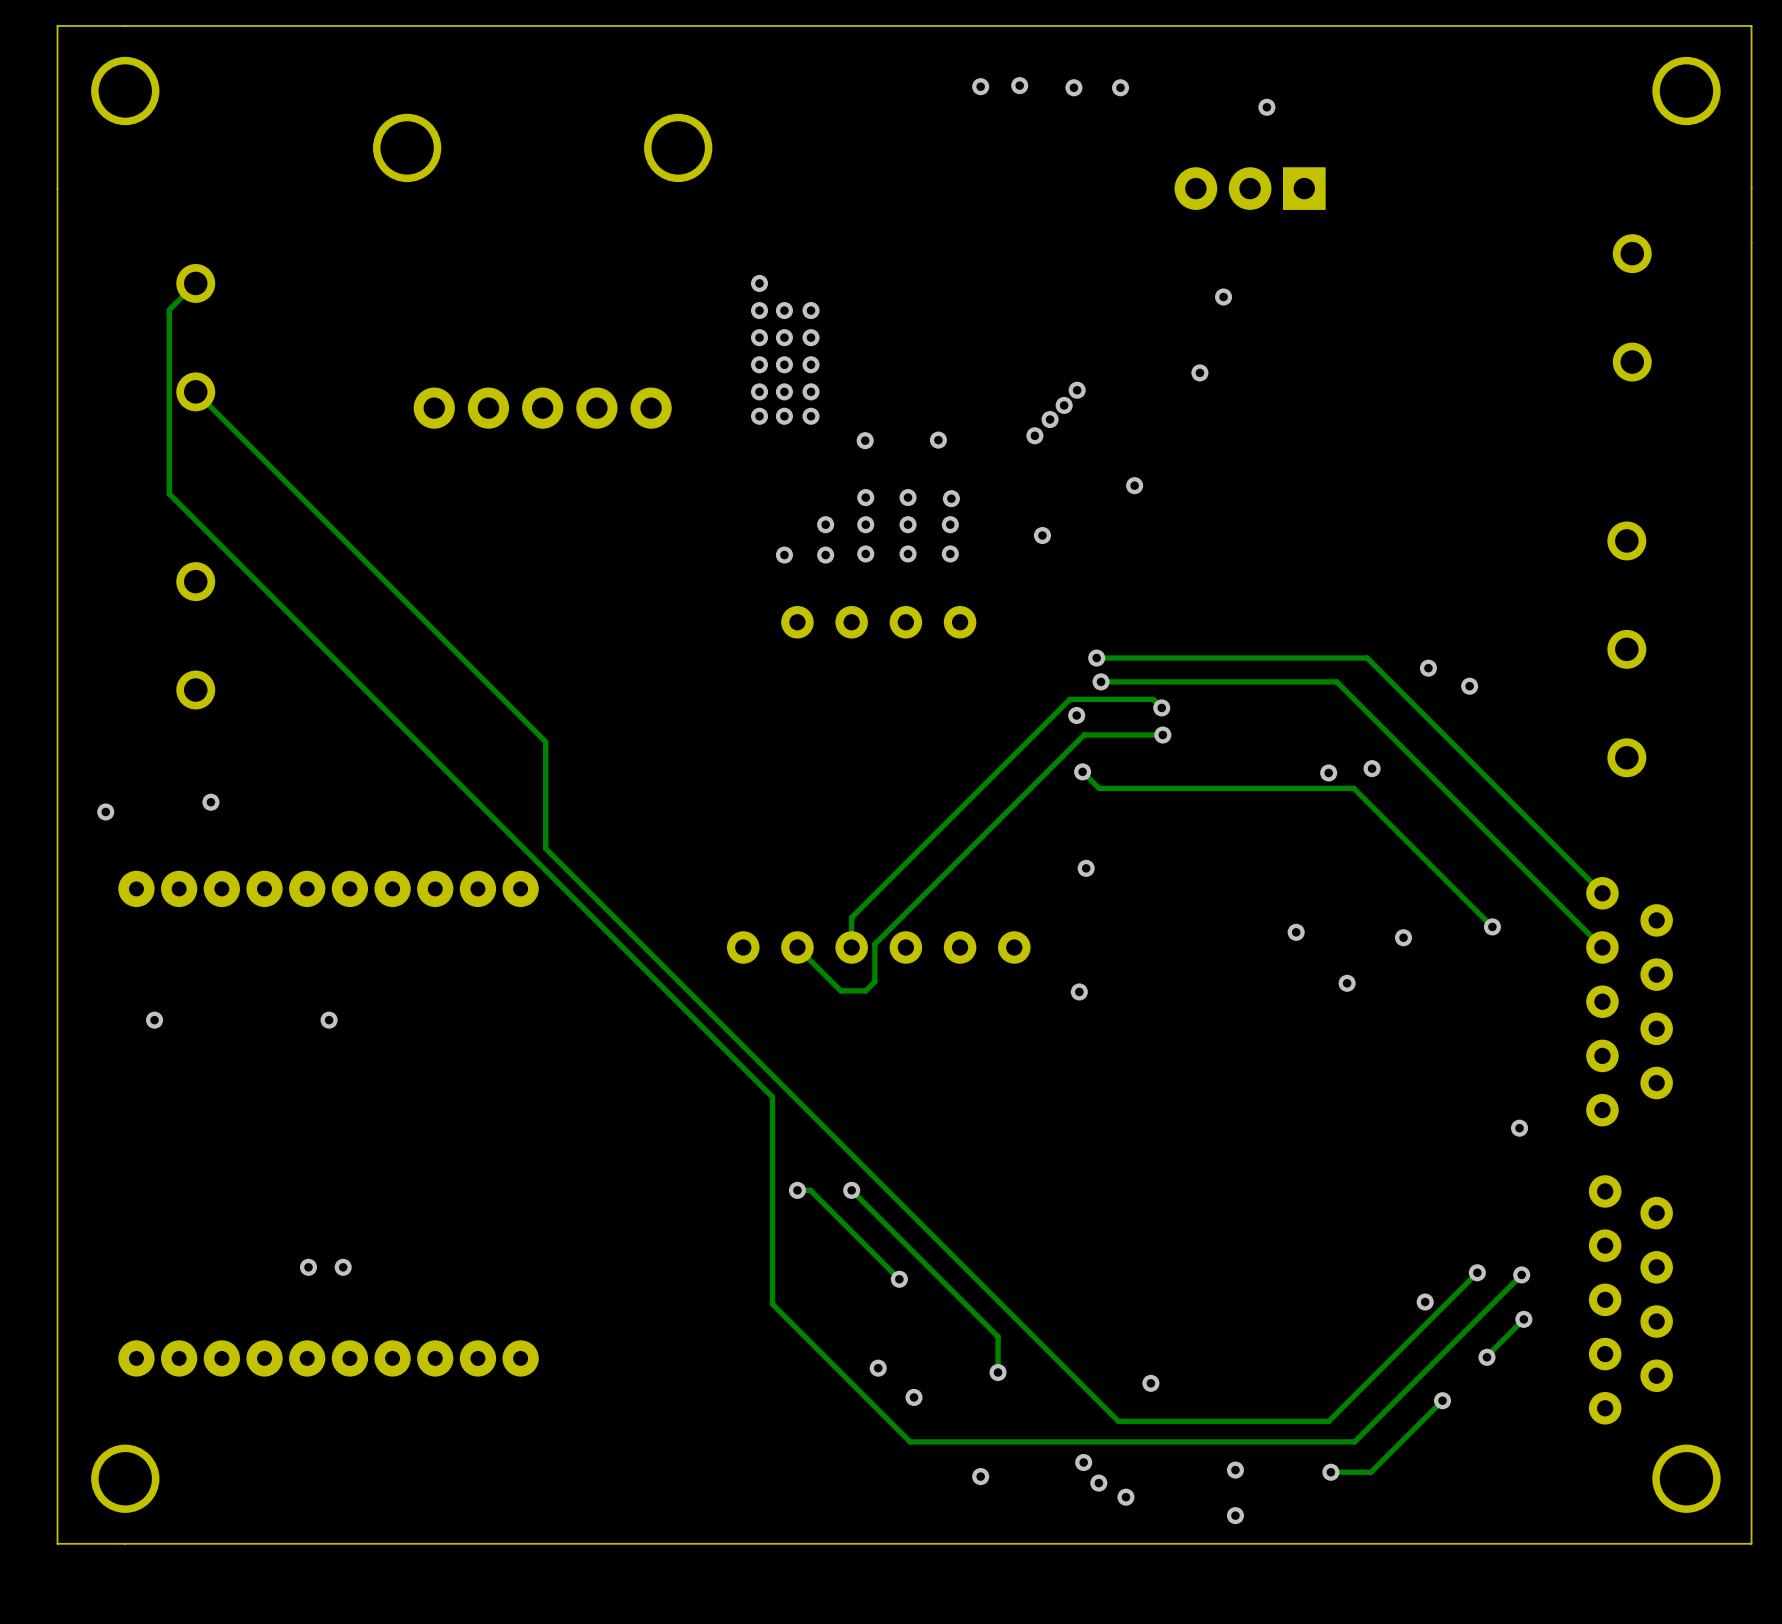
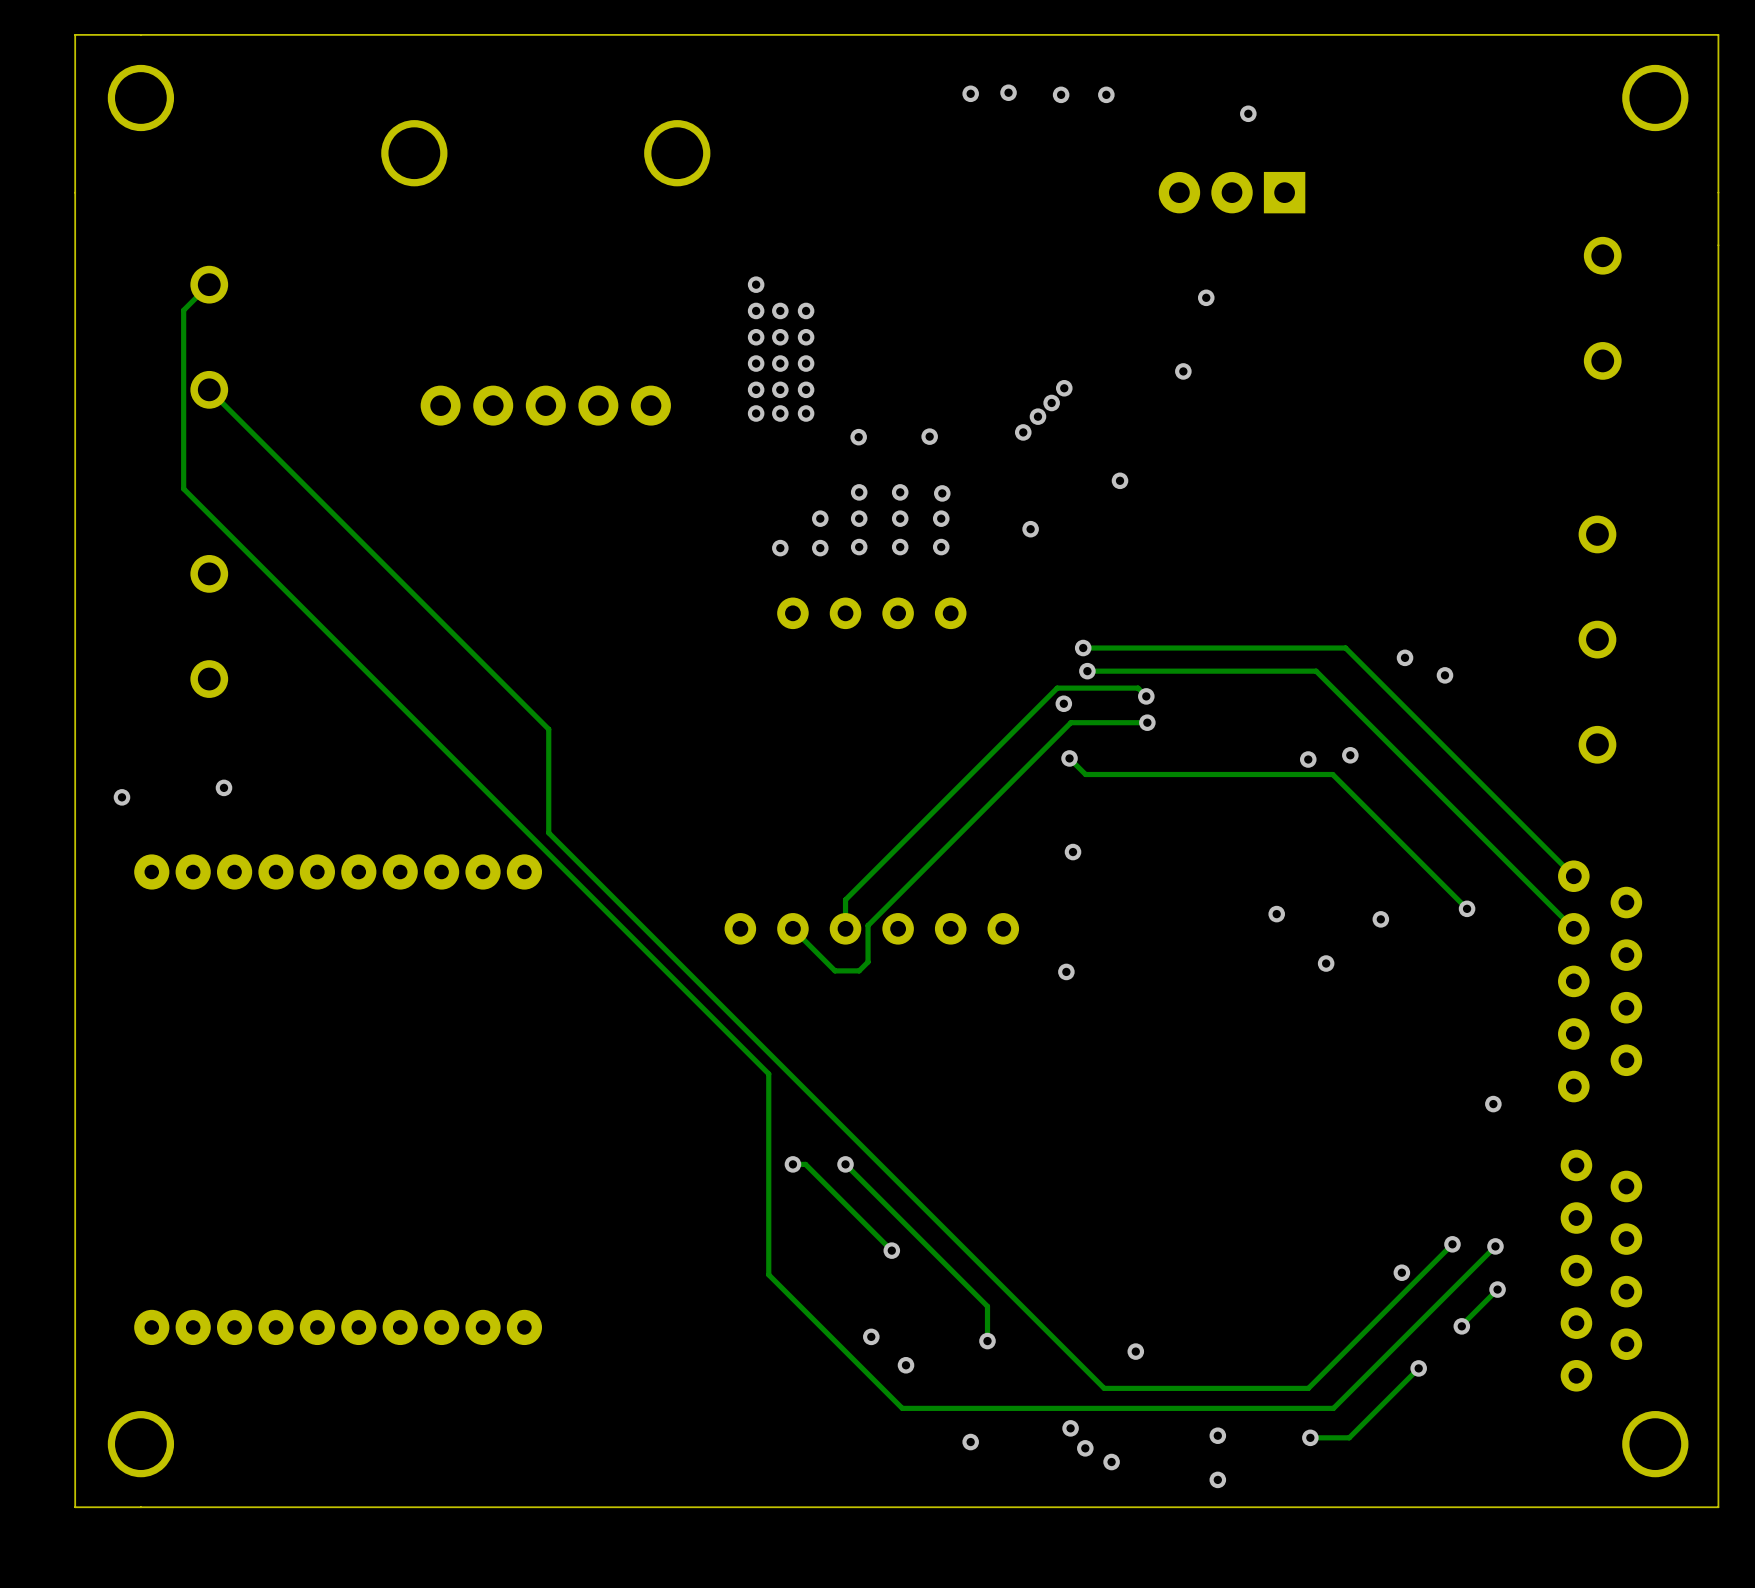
via: (154, 1020) -> none
via: (329, 1020) -> none
via: (308, 1267) -> none
via: (343, 1267) -> none

